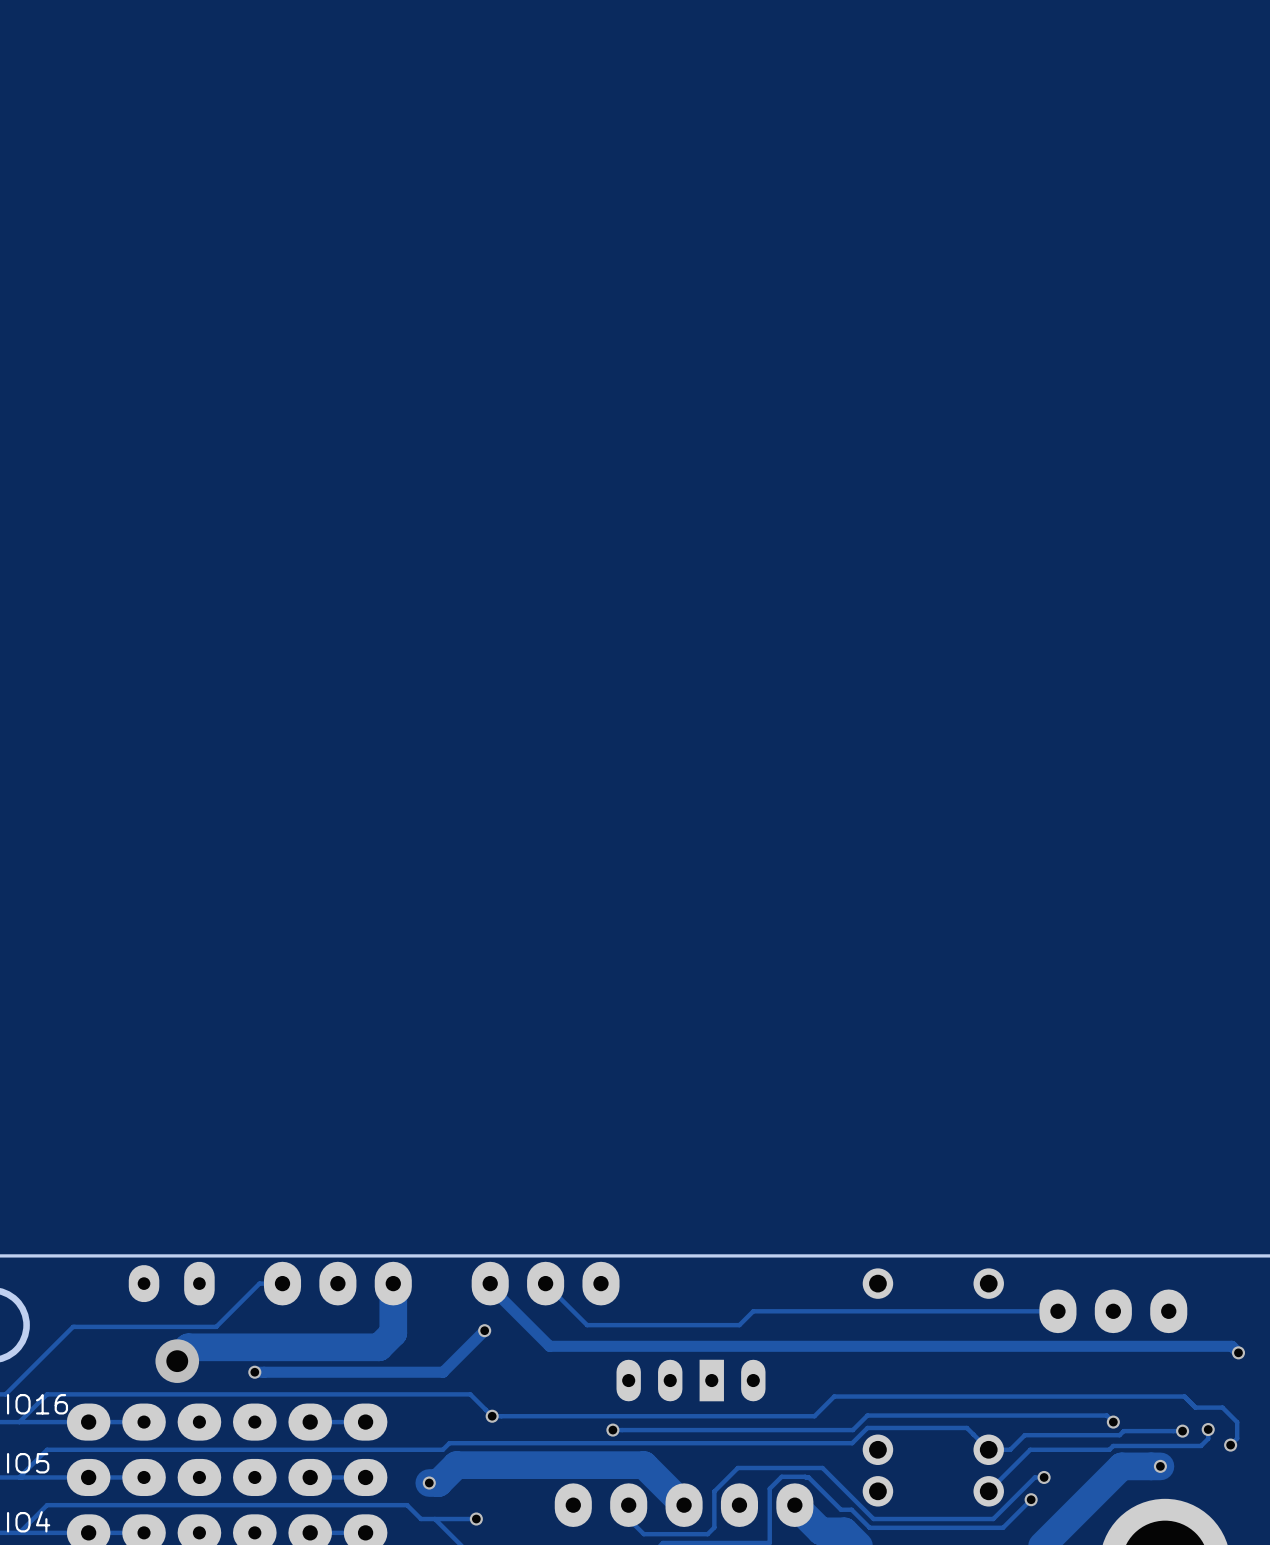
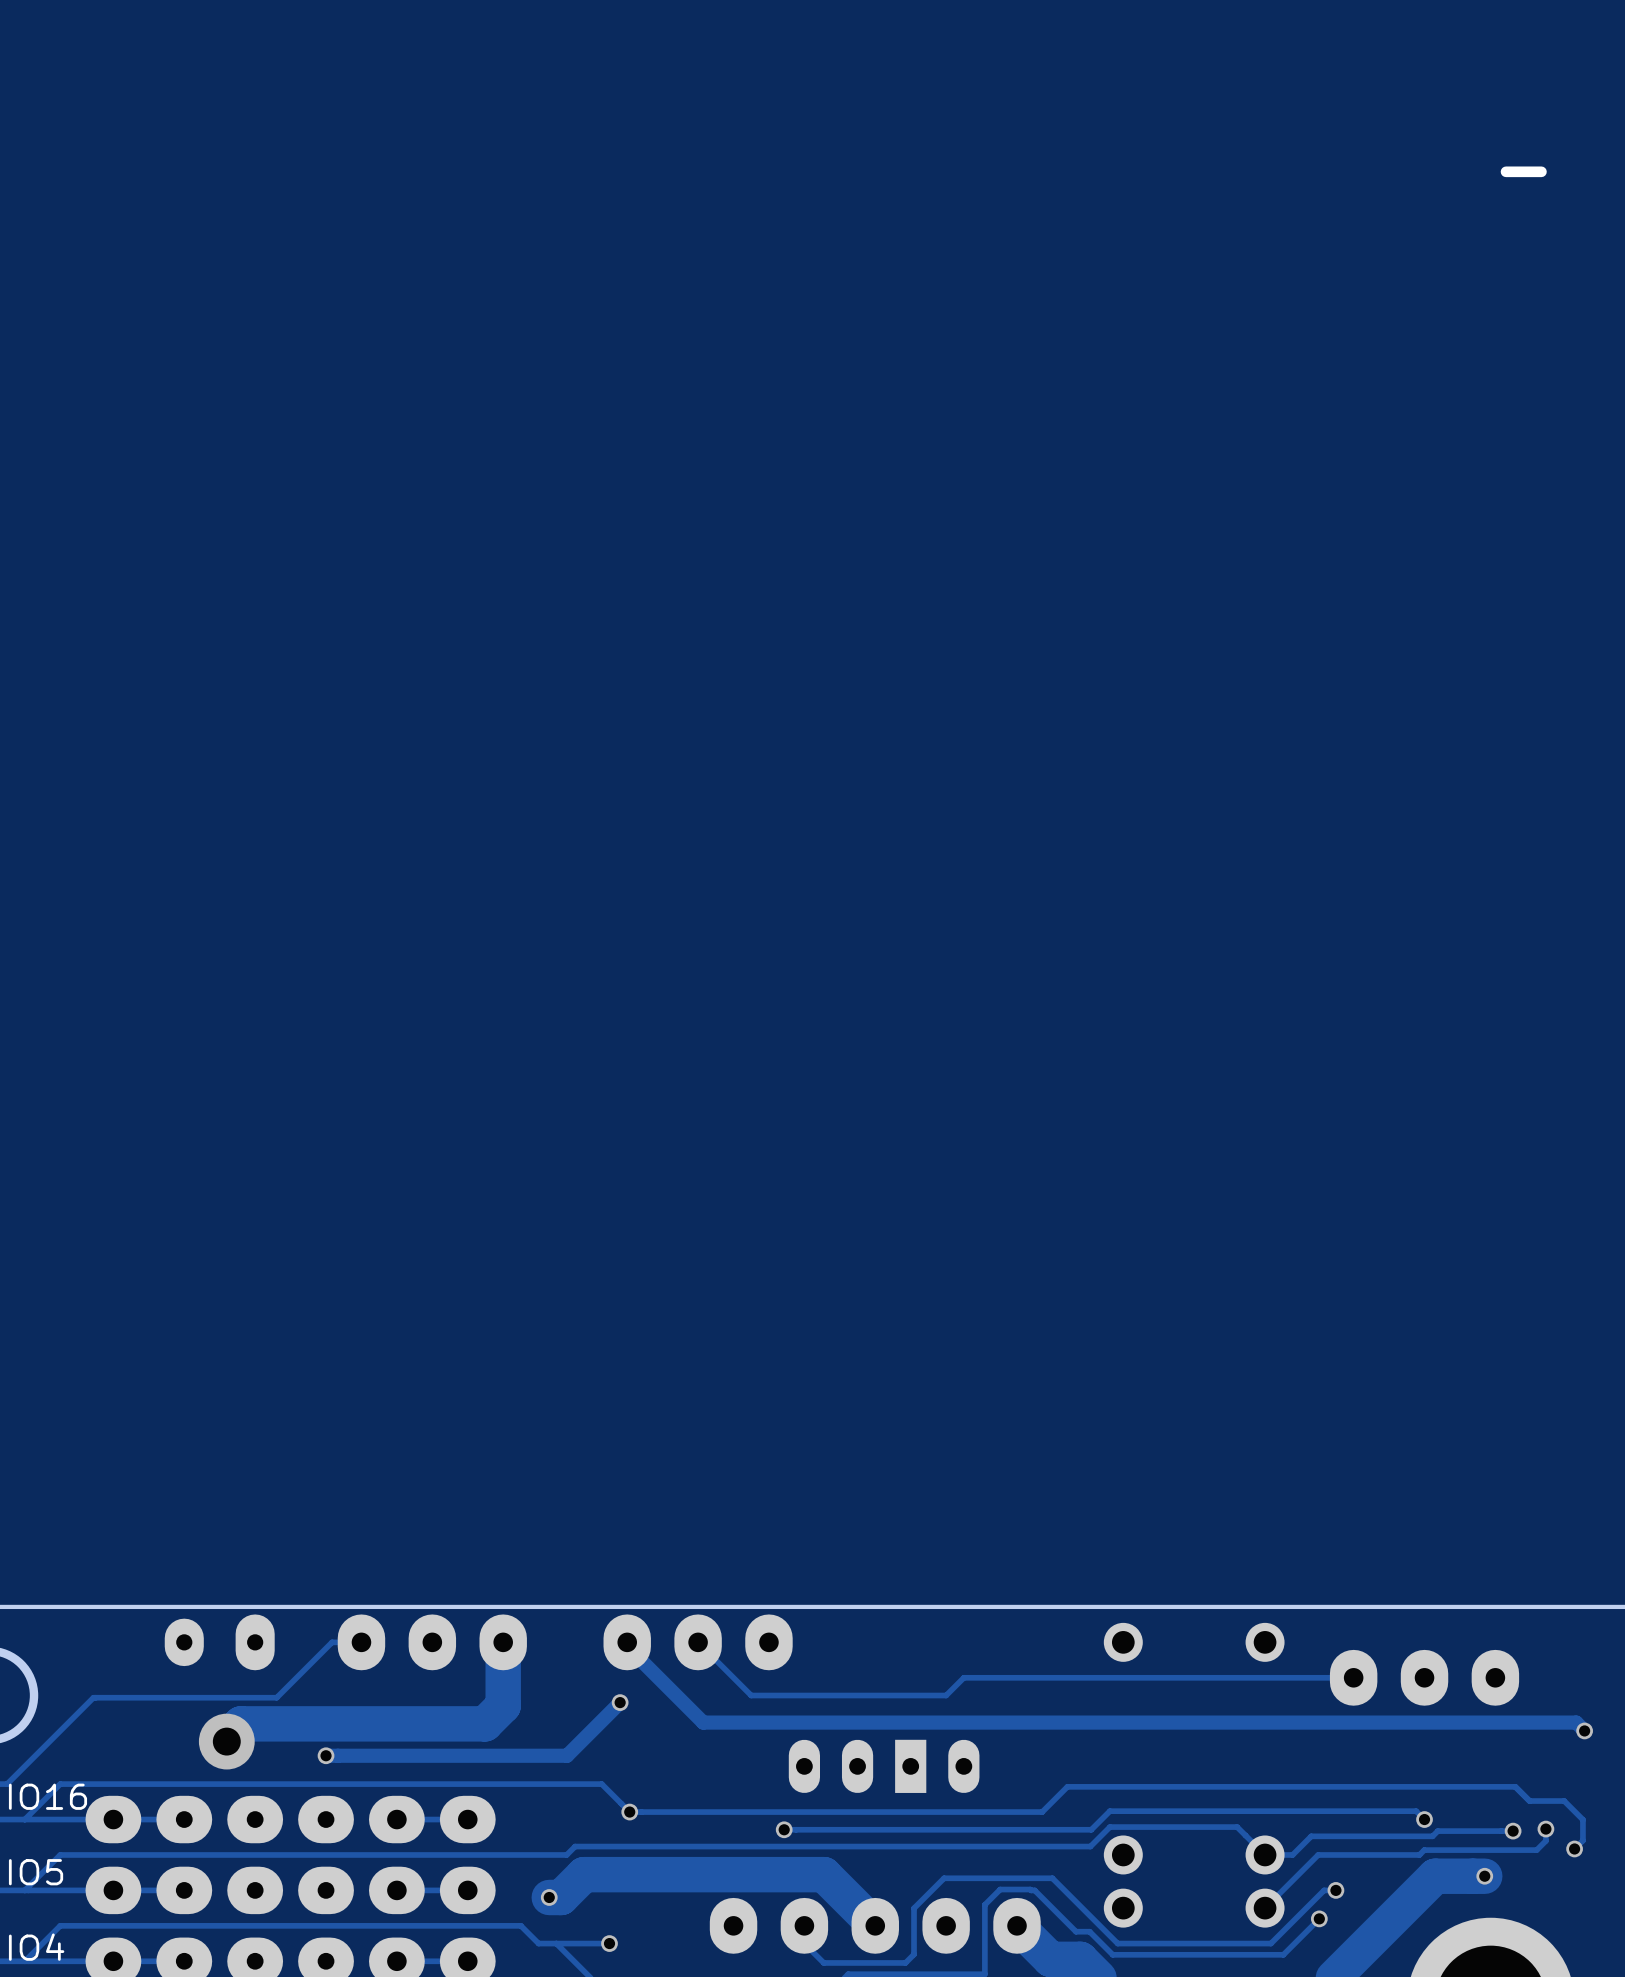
line: none -> (1541, 171) (1506, 171)

